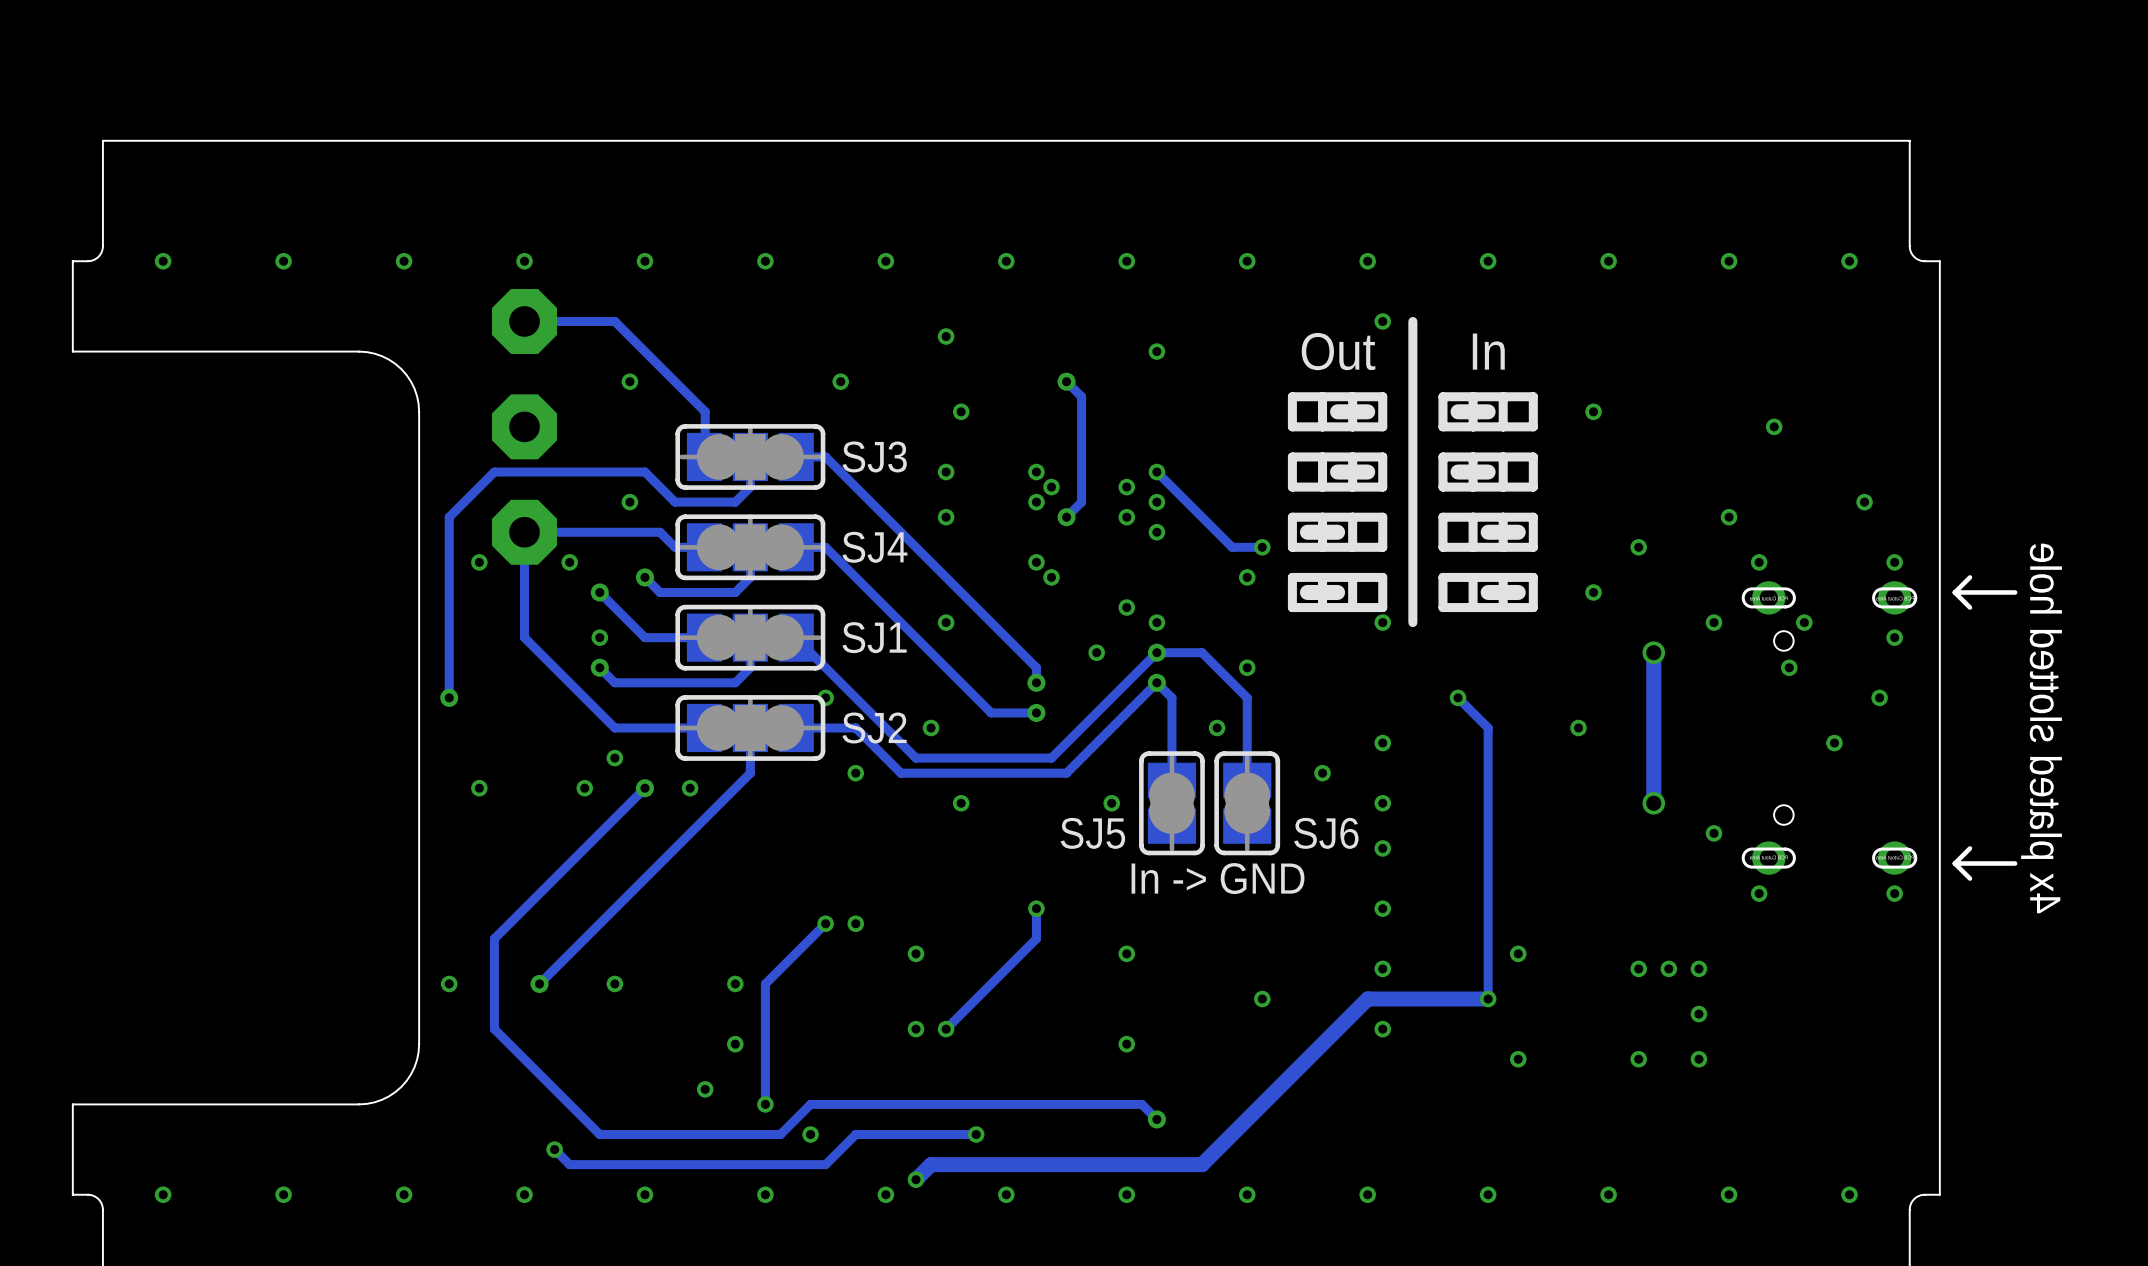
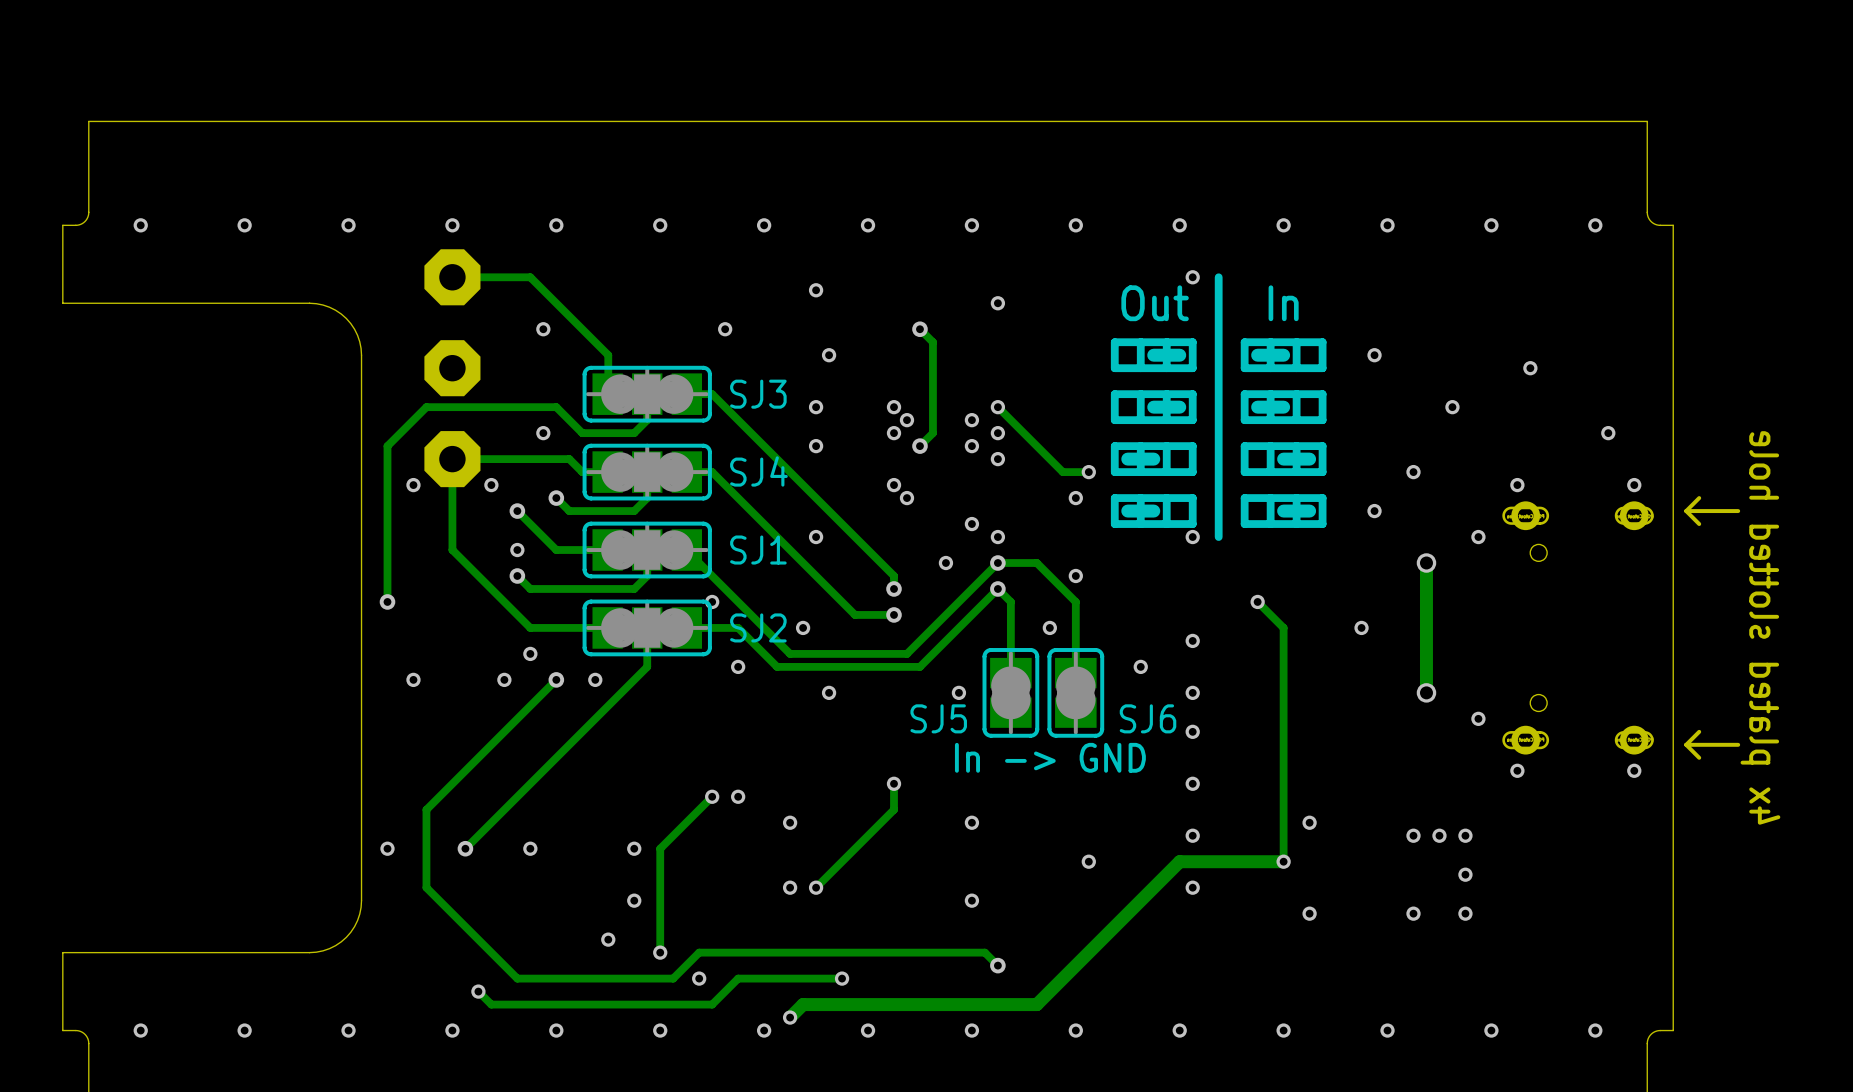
via position: (1729, 517) -> (1452, 407)
via: (1804, 622) -> none
via: (1894, 637) -> none
via: (1789, 667) -> none
via: (1879, 697) -> none
via: (1834, 743) -> none

